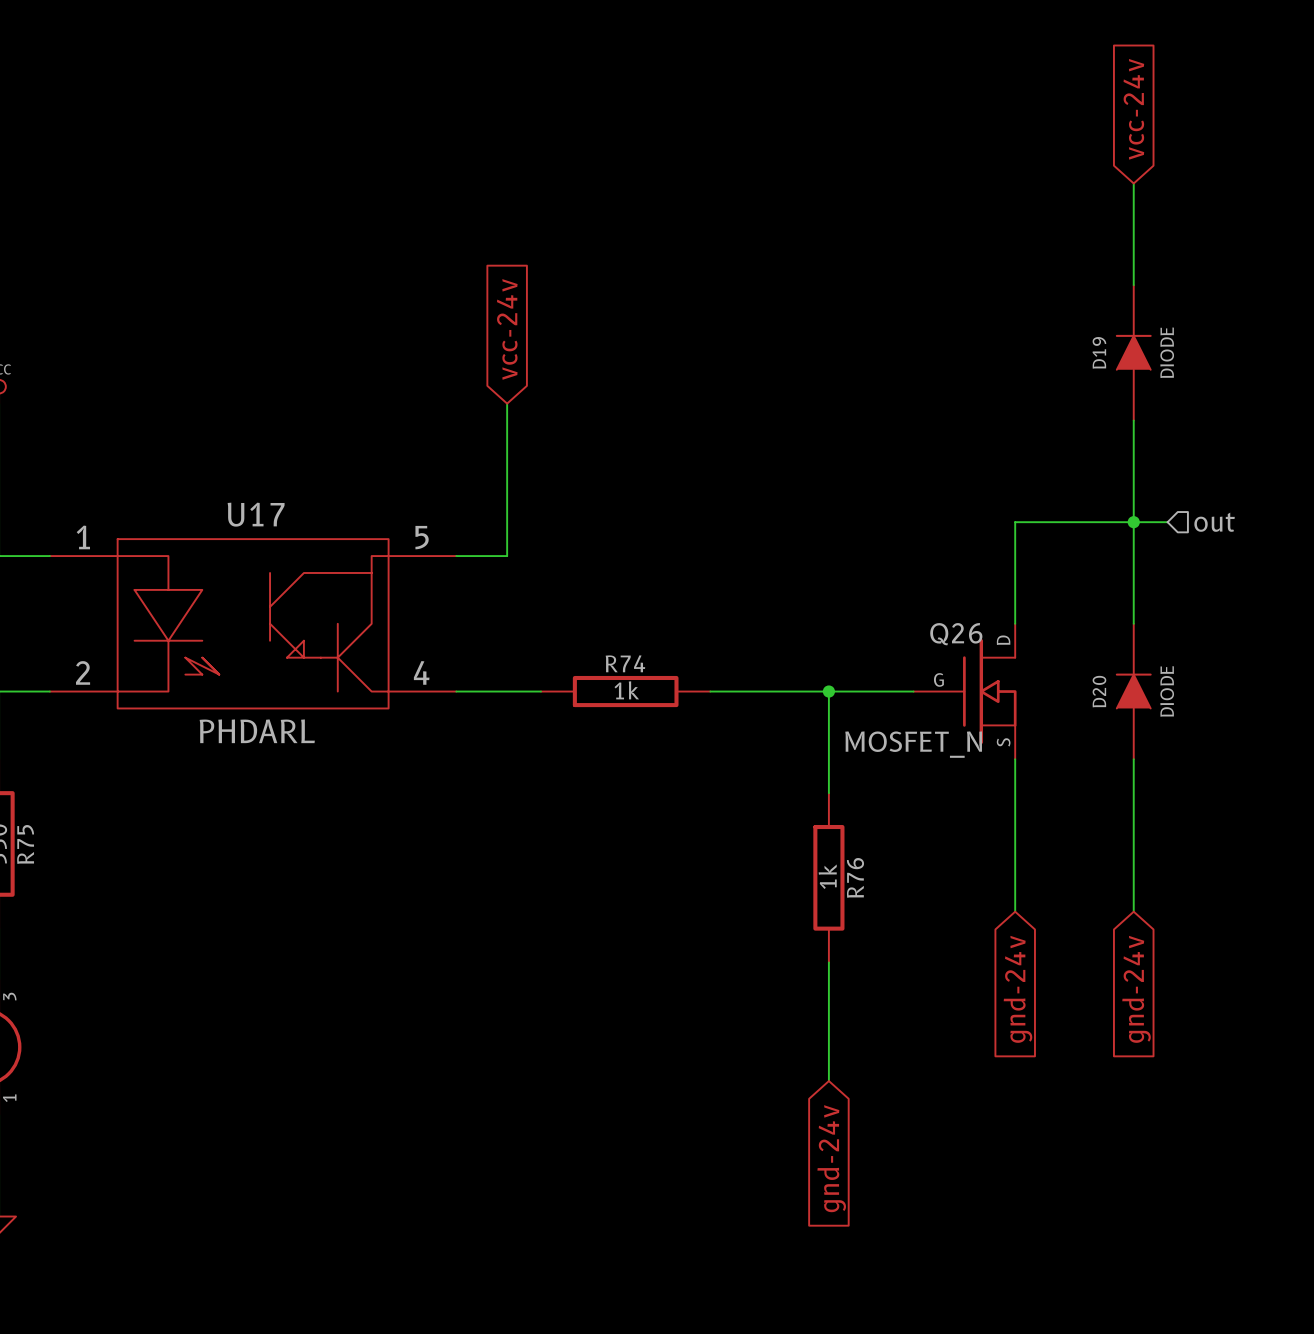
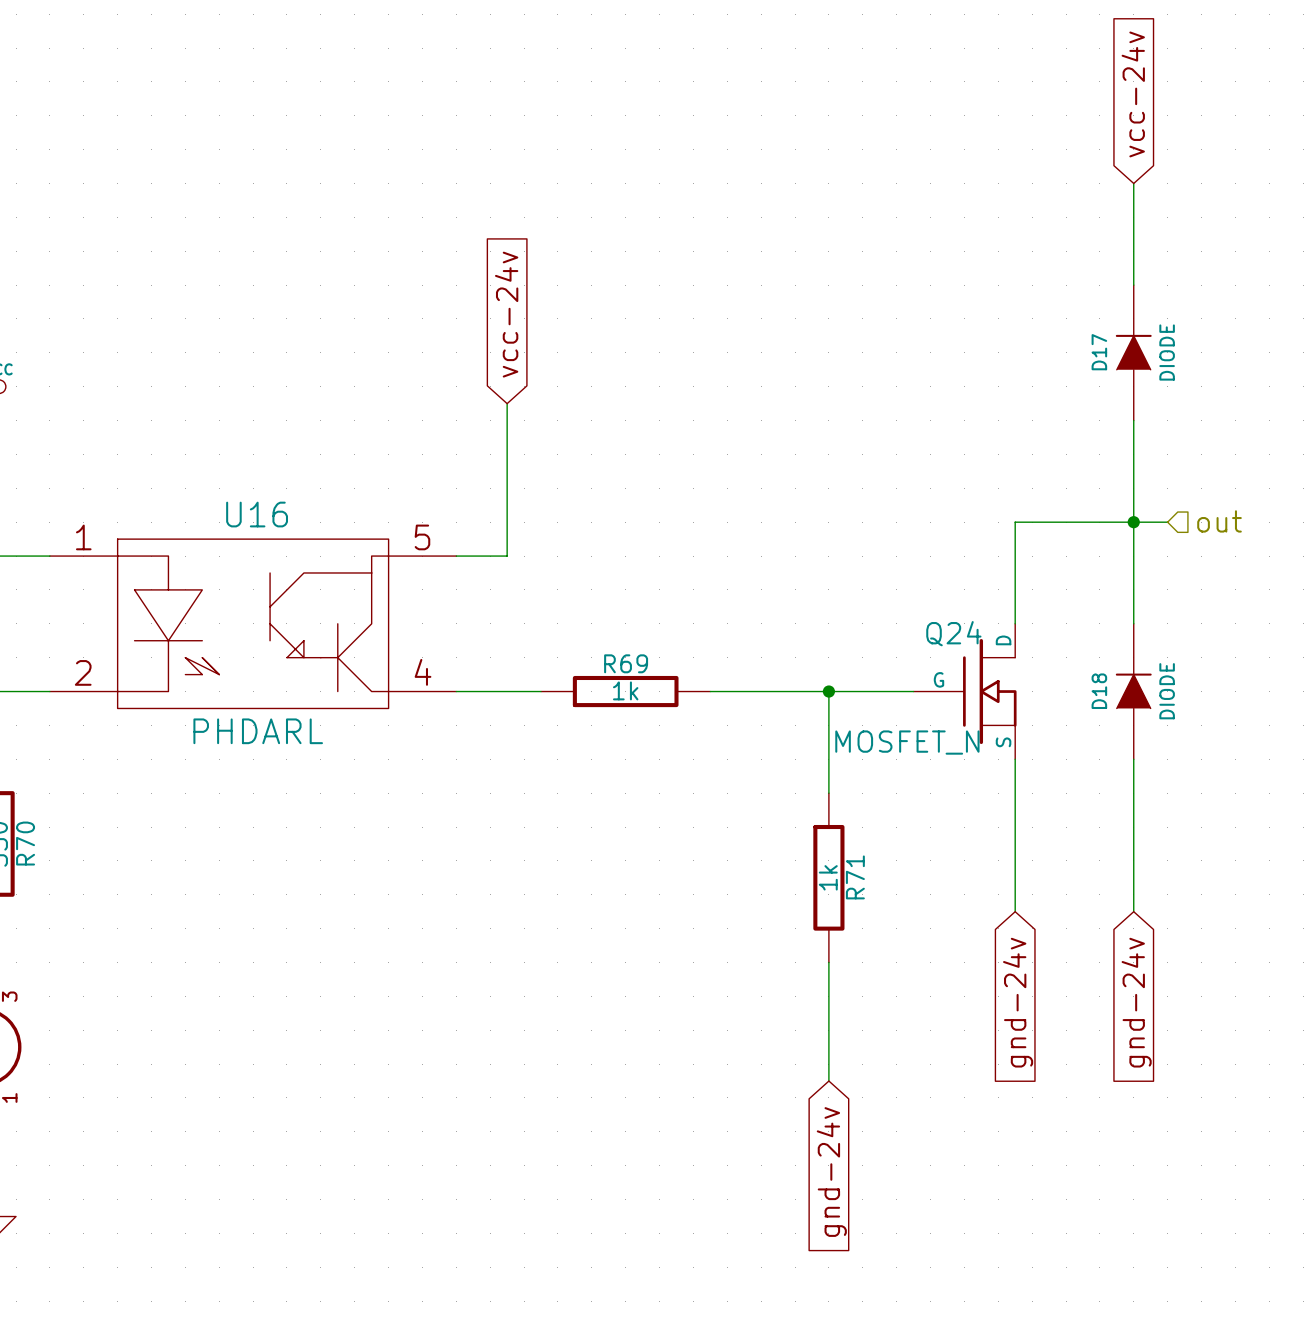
D19 name: D19 (1099, 352) -> D17 (1099, 352)
U17 name: U17 (256, 514) -> U16 (257, 514)
Q26 name: Q26 (956, 634) -> Q24 (953, 633)
R74 name: R74 (625, 663) -> R69 (626, 663)
D20 name: D20 (1099, 691) -> D18 (1099, 691)
R75 name: R75 (25, 844) -> R70 (25, 843)
R76 name: R76 (855, 877) -> R71 (855, 877)

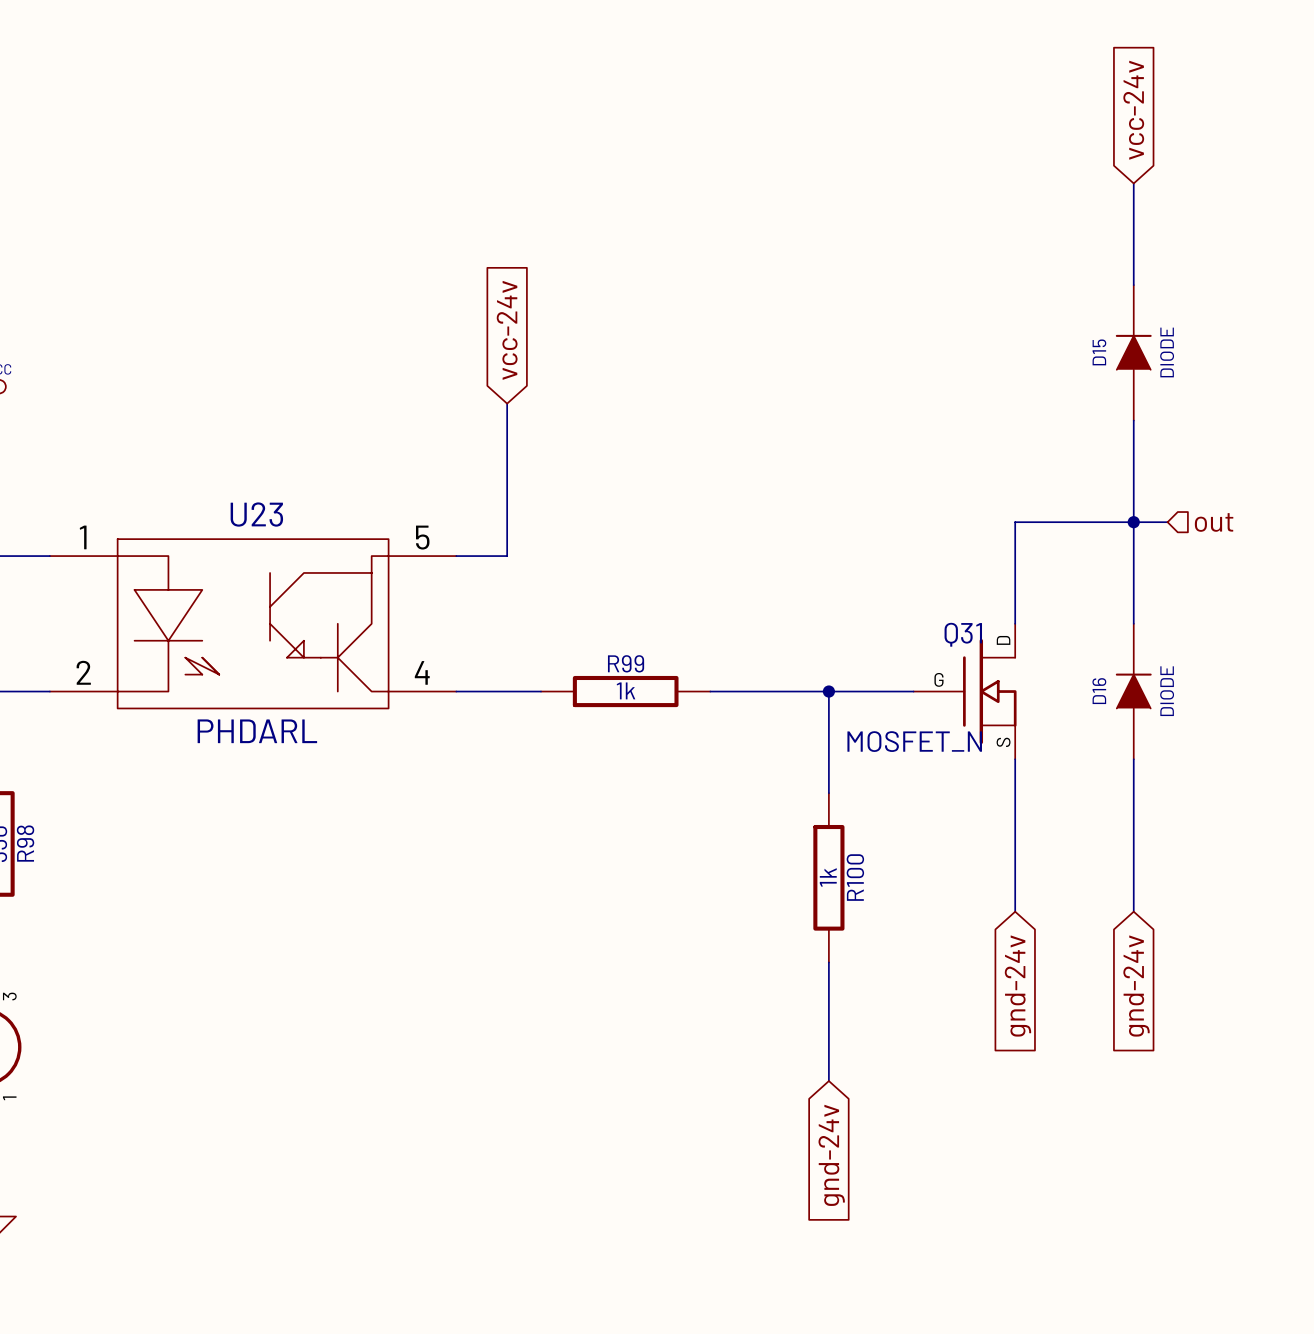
D17 name: D17 (1099, 352) -> D15 (1099, 352)
U16 name: U16 (257, 514) -> U23 (256, 514)
Q24 name: Q24 (953, 633) -> Q31 (963, 634)
R69 name: R69 (626, 663) -> R99 (626, 663)
D18 name: D18 (1099, 691) -> D16 (1099, 691)
R70 name: R70 (25, 843) -> R98 (25, 843)
R71 name: R71 (855, 877) -> R100 (855, 877)

